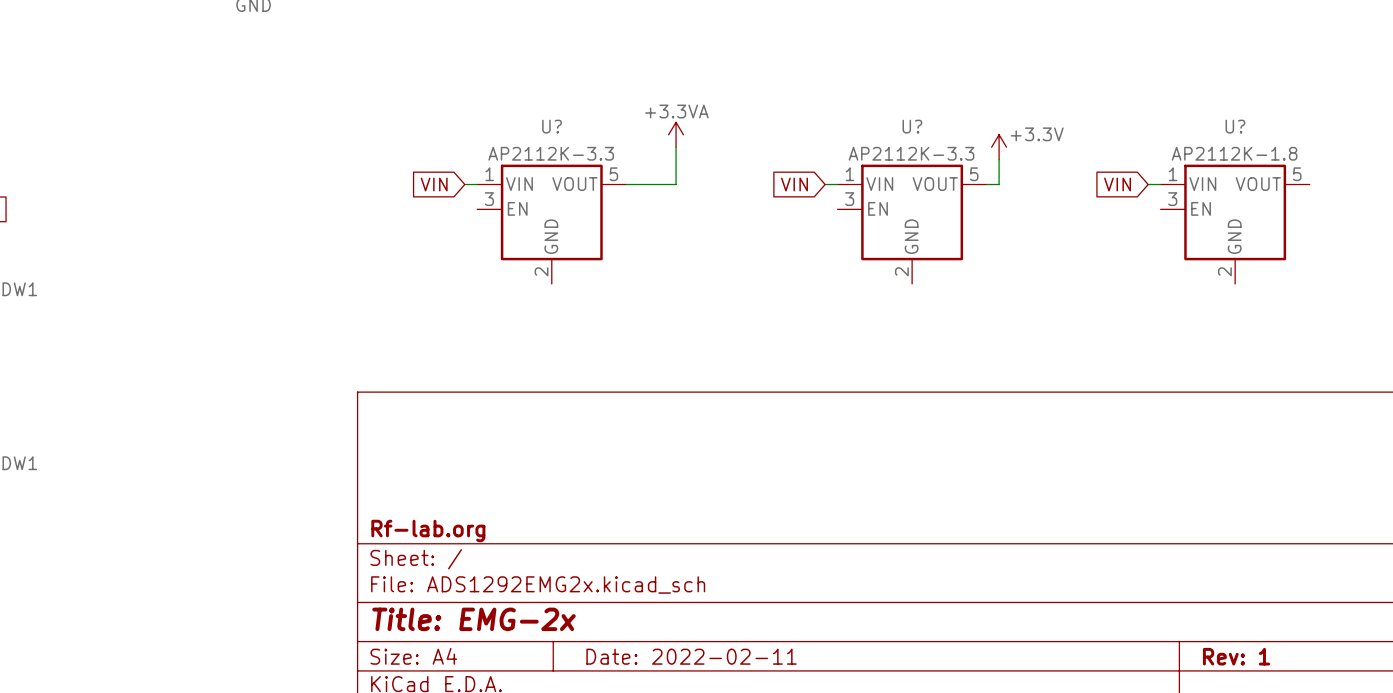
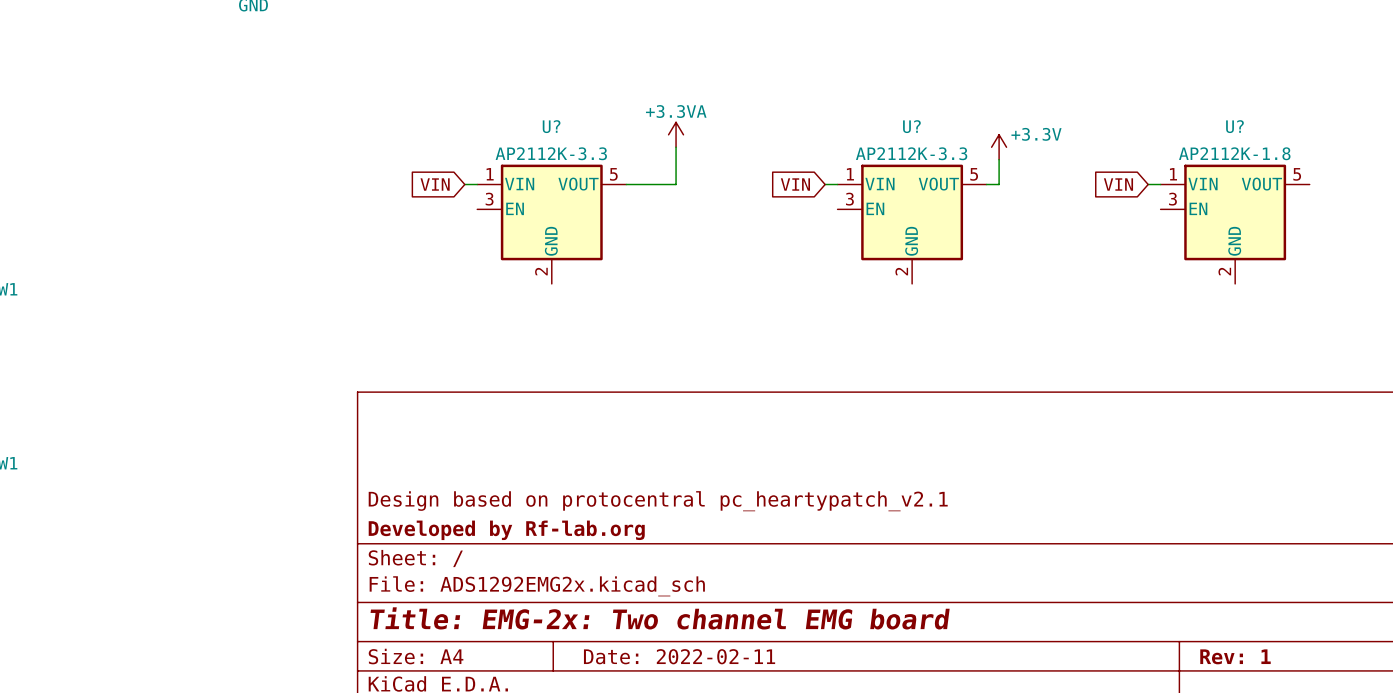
title block: none -> Design based on protocentral pc_heartypatch_v2.1 (658, 501)
title block: Rf-lab.org (428, 530) -> Developed by Rf-lab.org (506, 530)
title block: Title: EMG-2x (474, 619) -> Title: EMG-2x: Two channel EMG board (660, 618)

